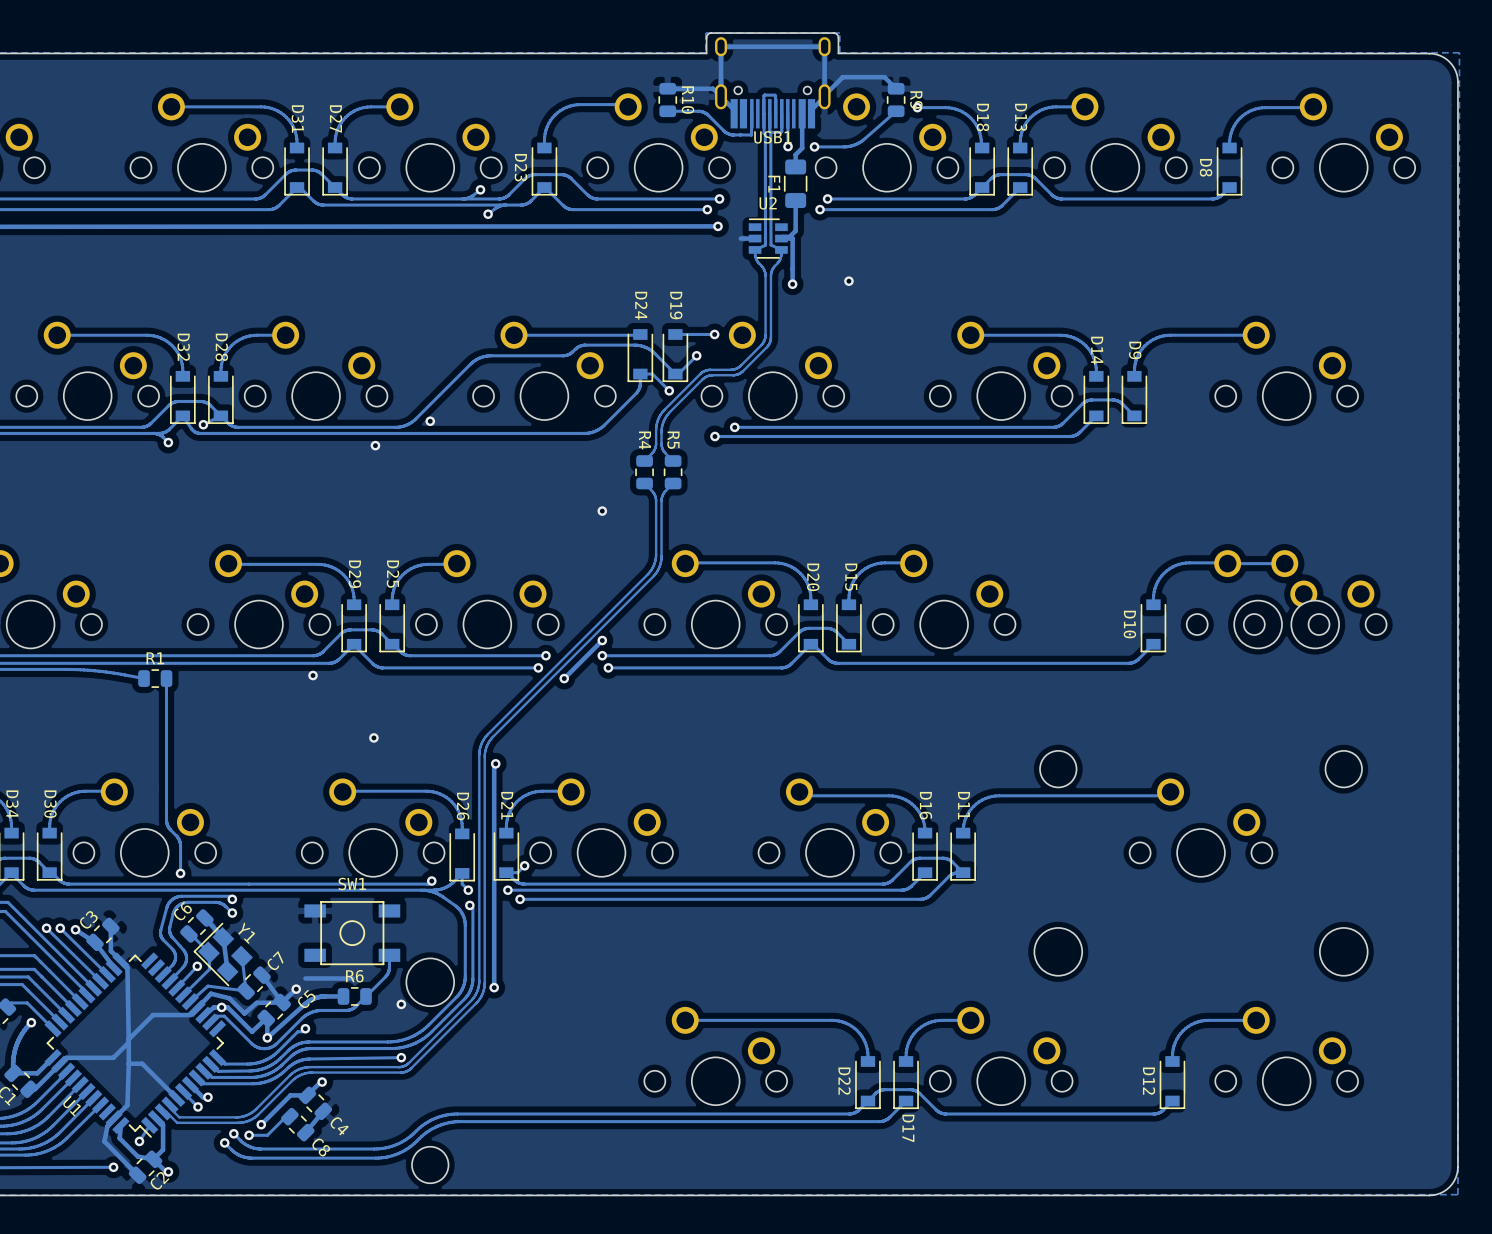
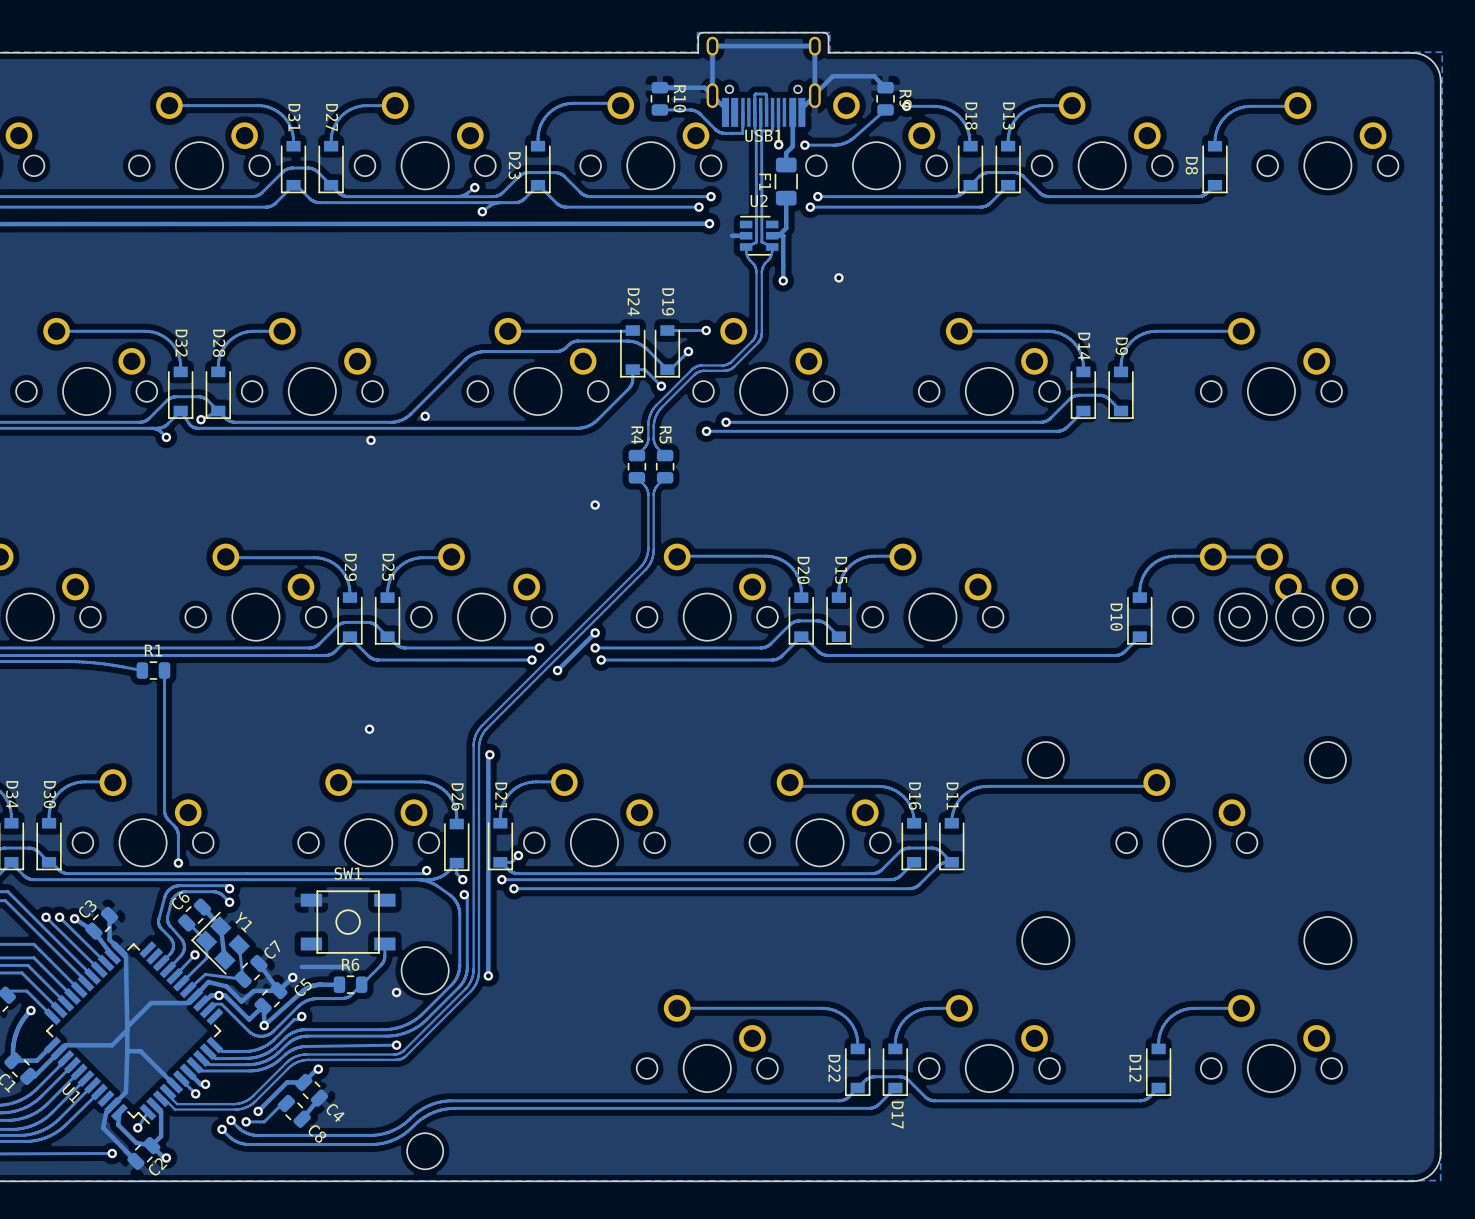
via: (313, 675) -> none

